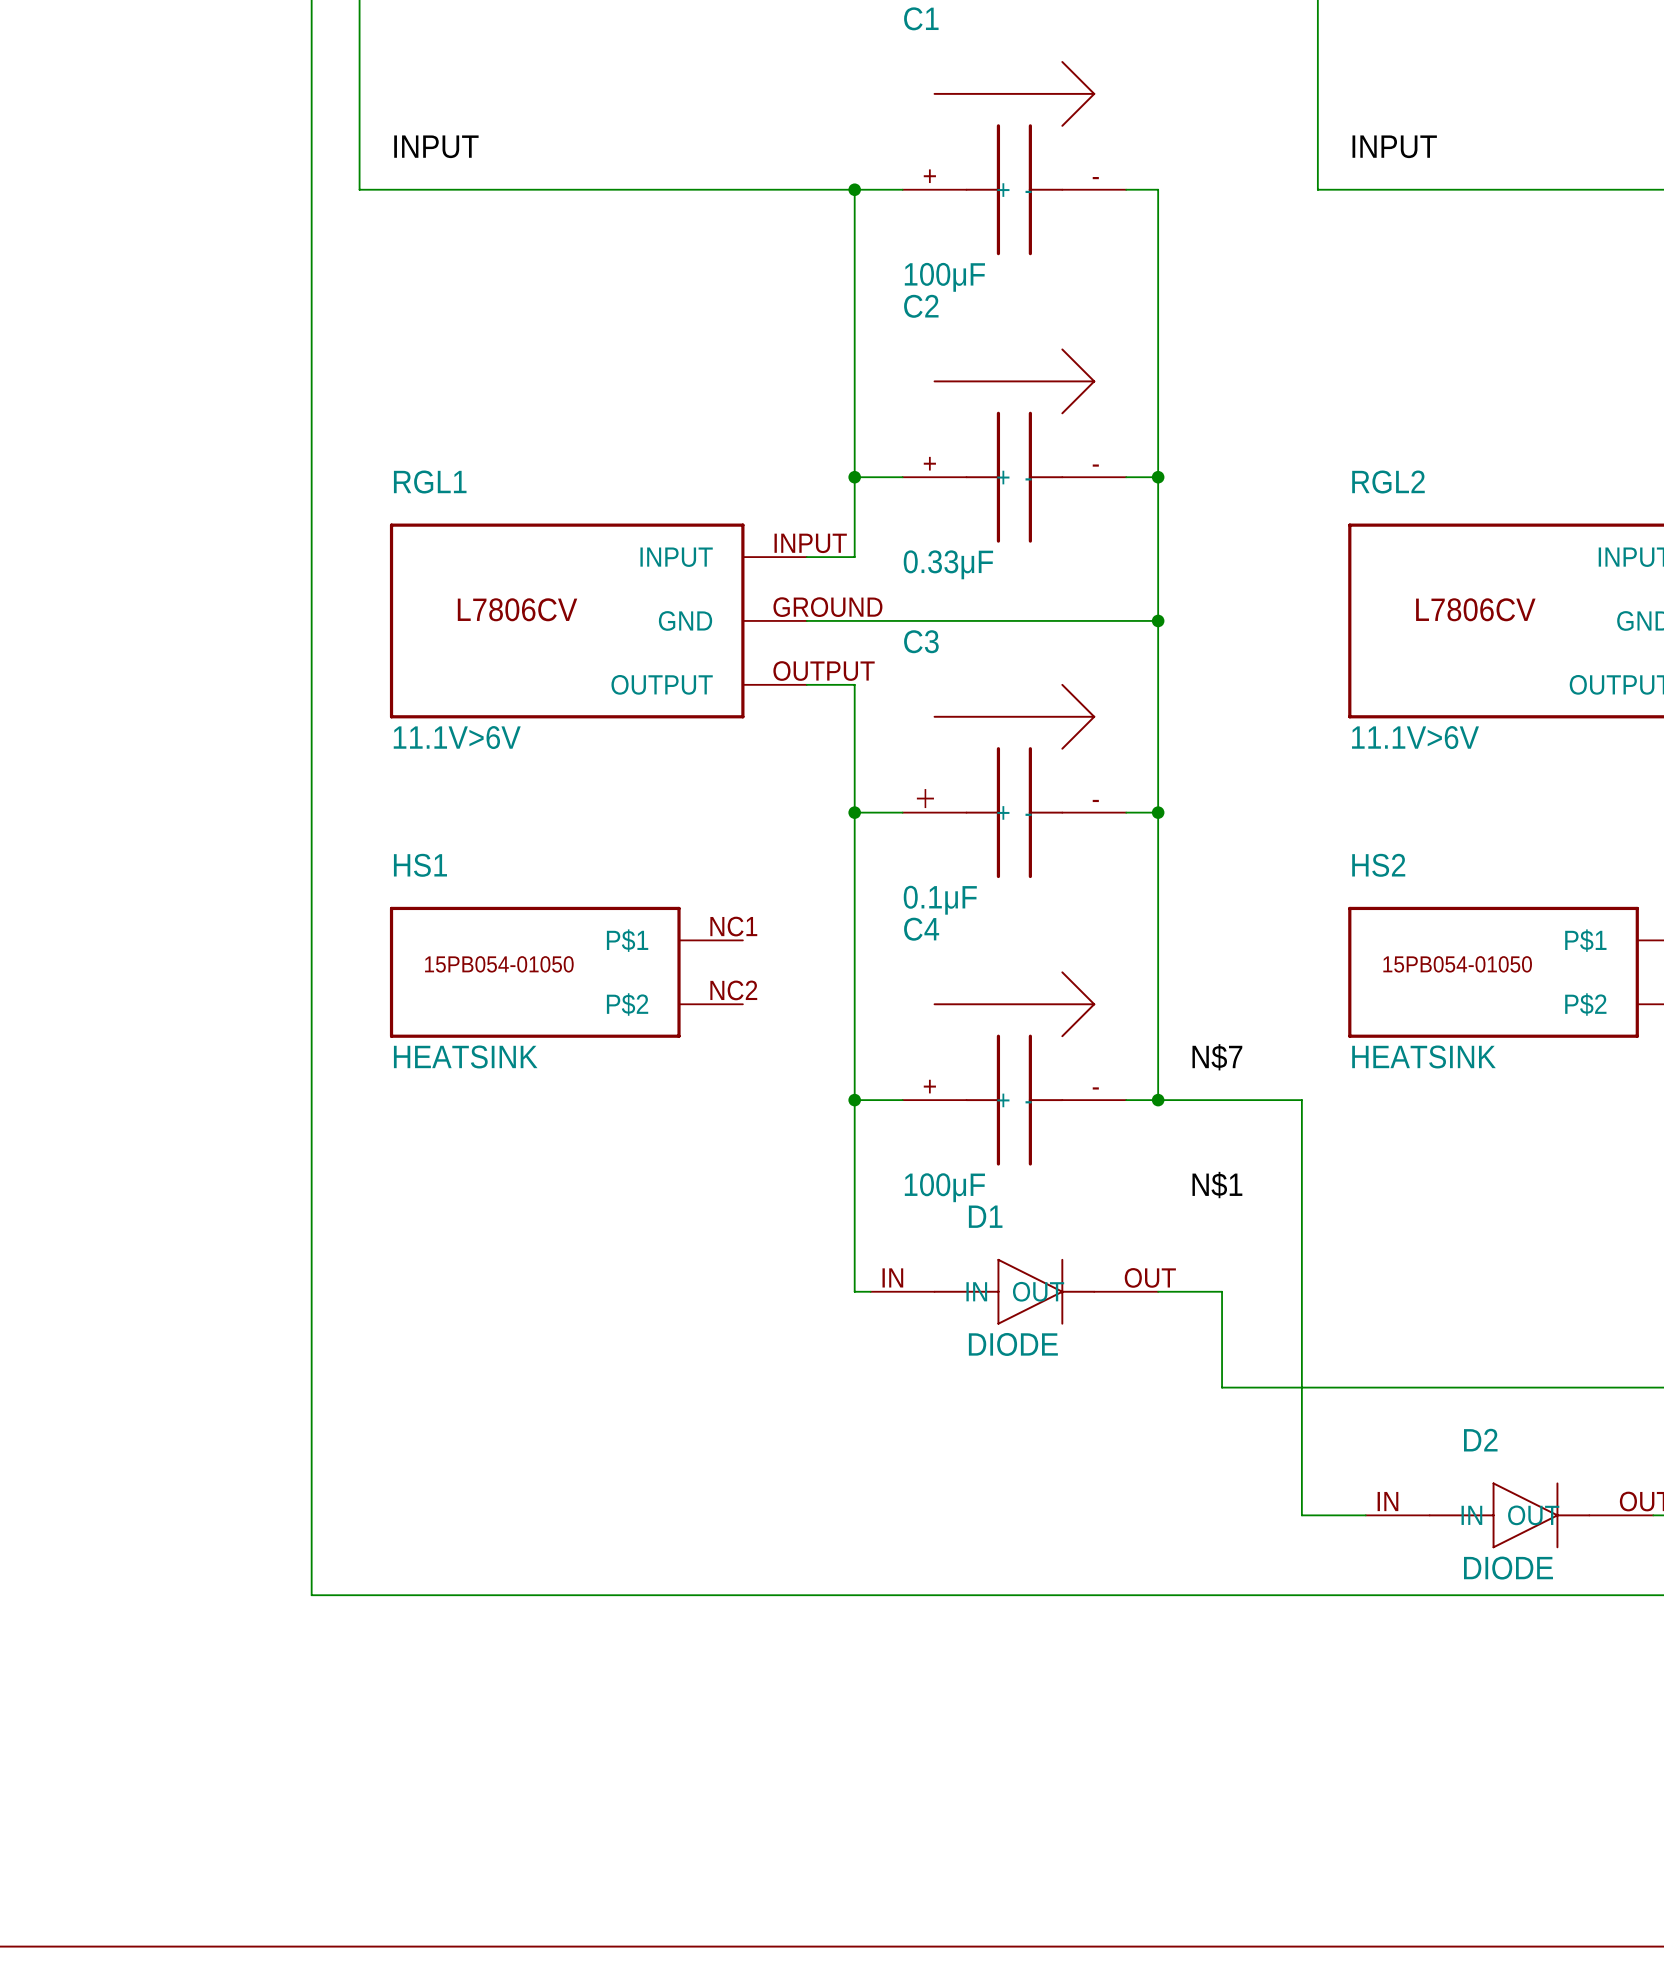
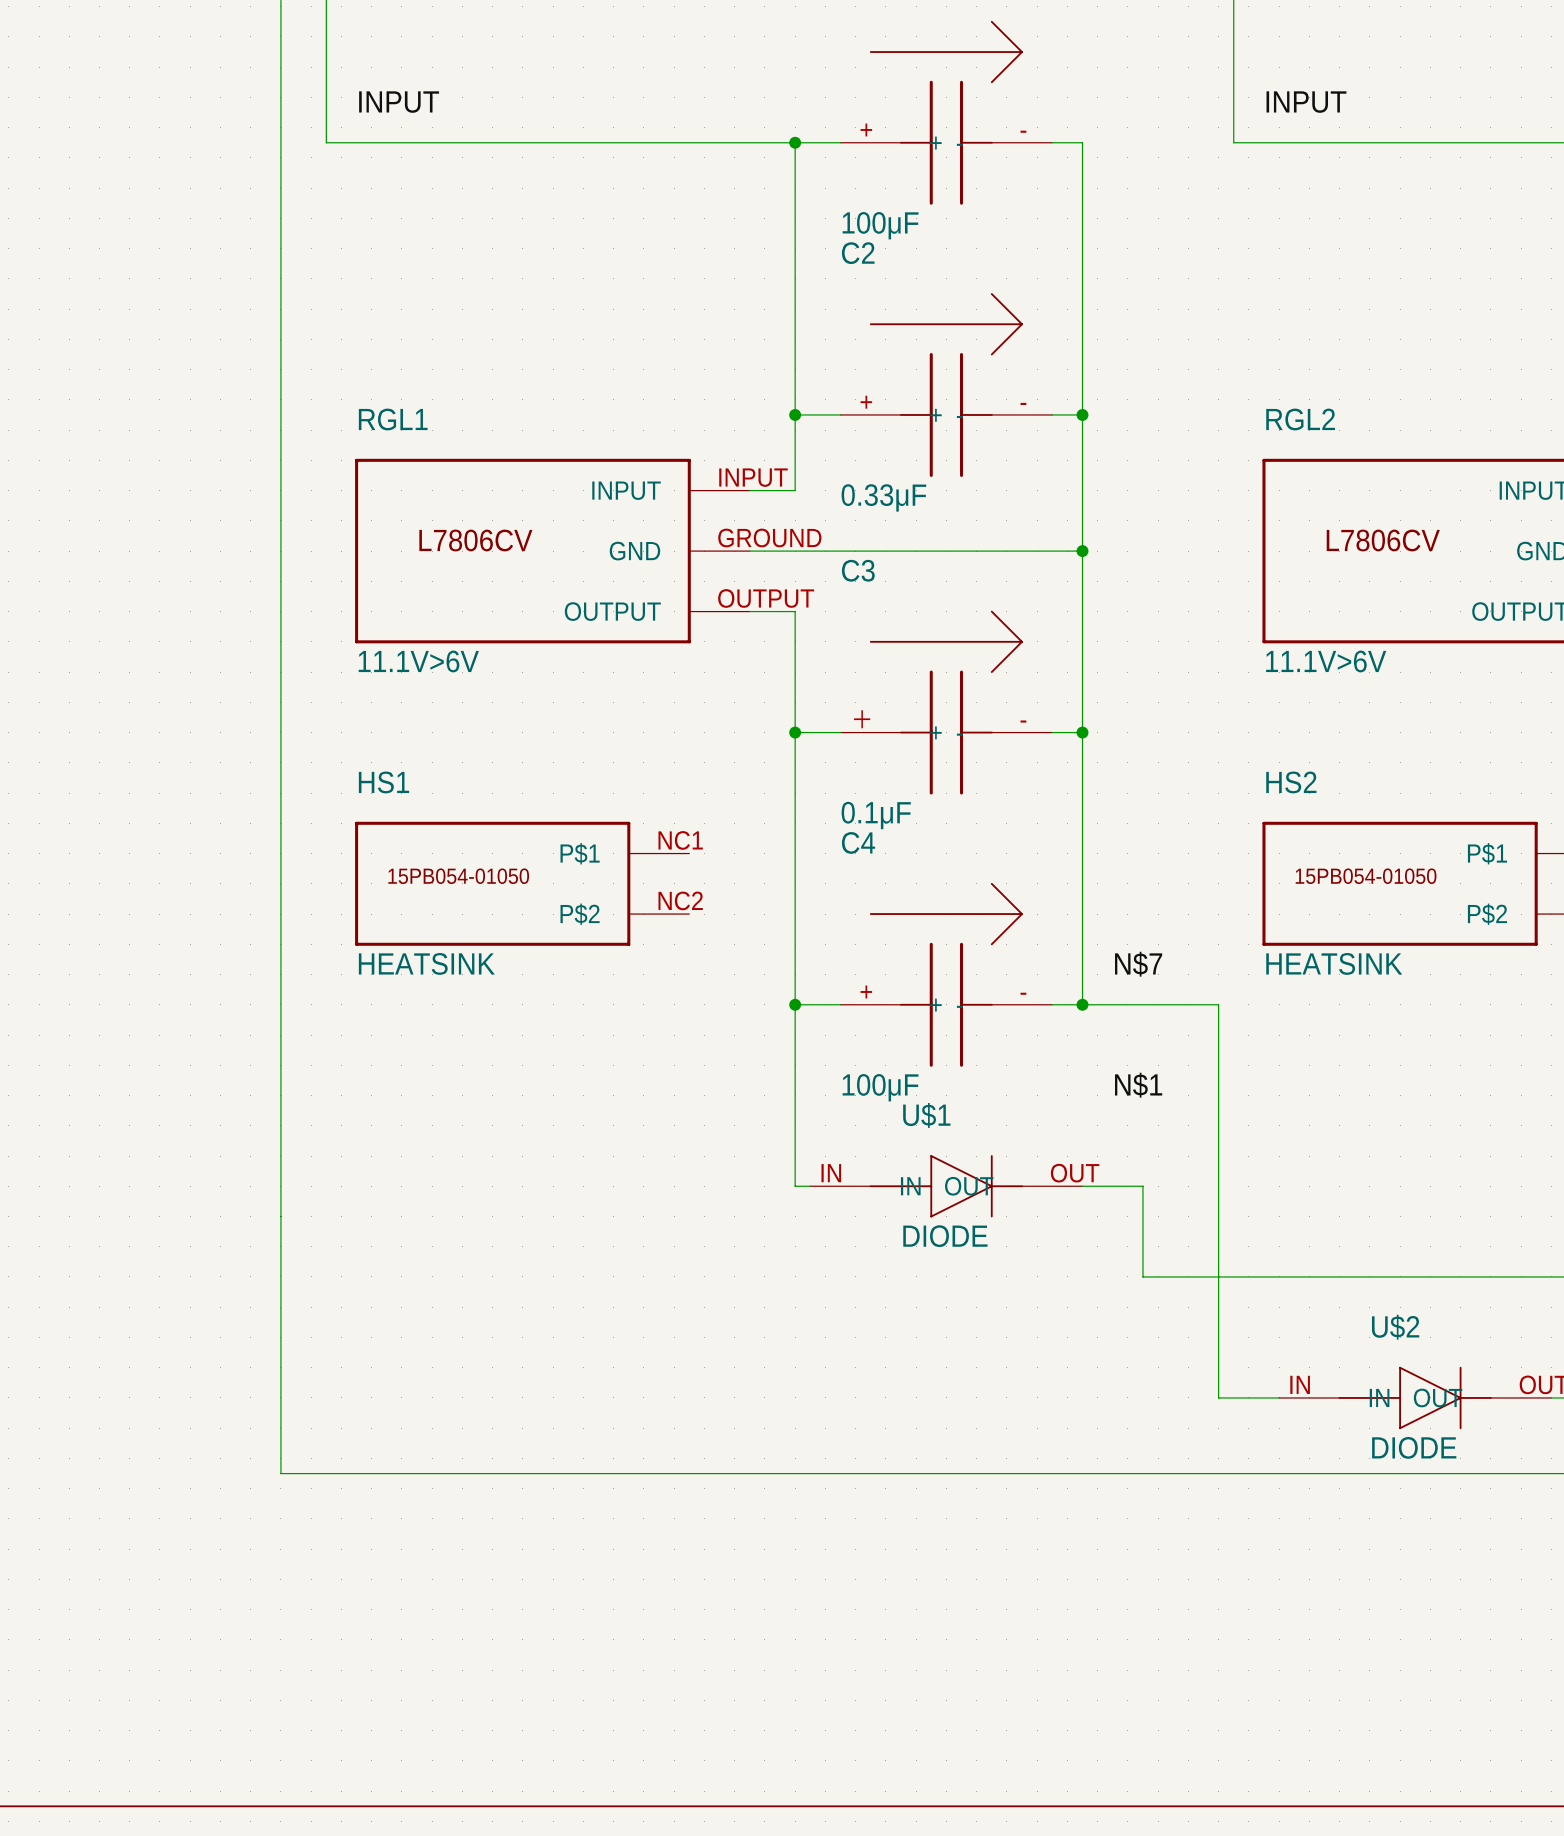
D1 name: D1 (985, 1216) -> U$1 (926, 1115)
D2 name: D2 (1480, 1440) -> U$2 (1395, 1327)

